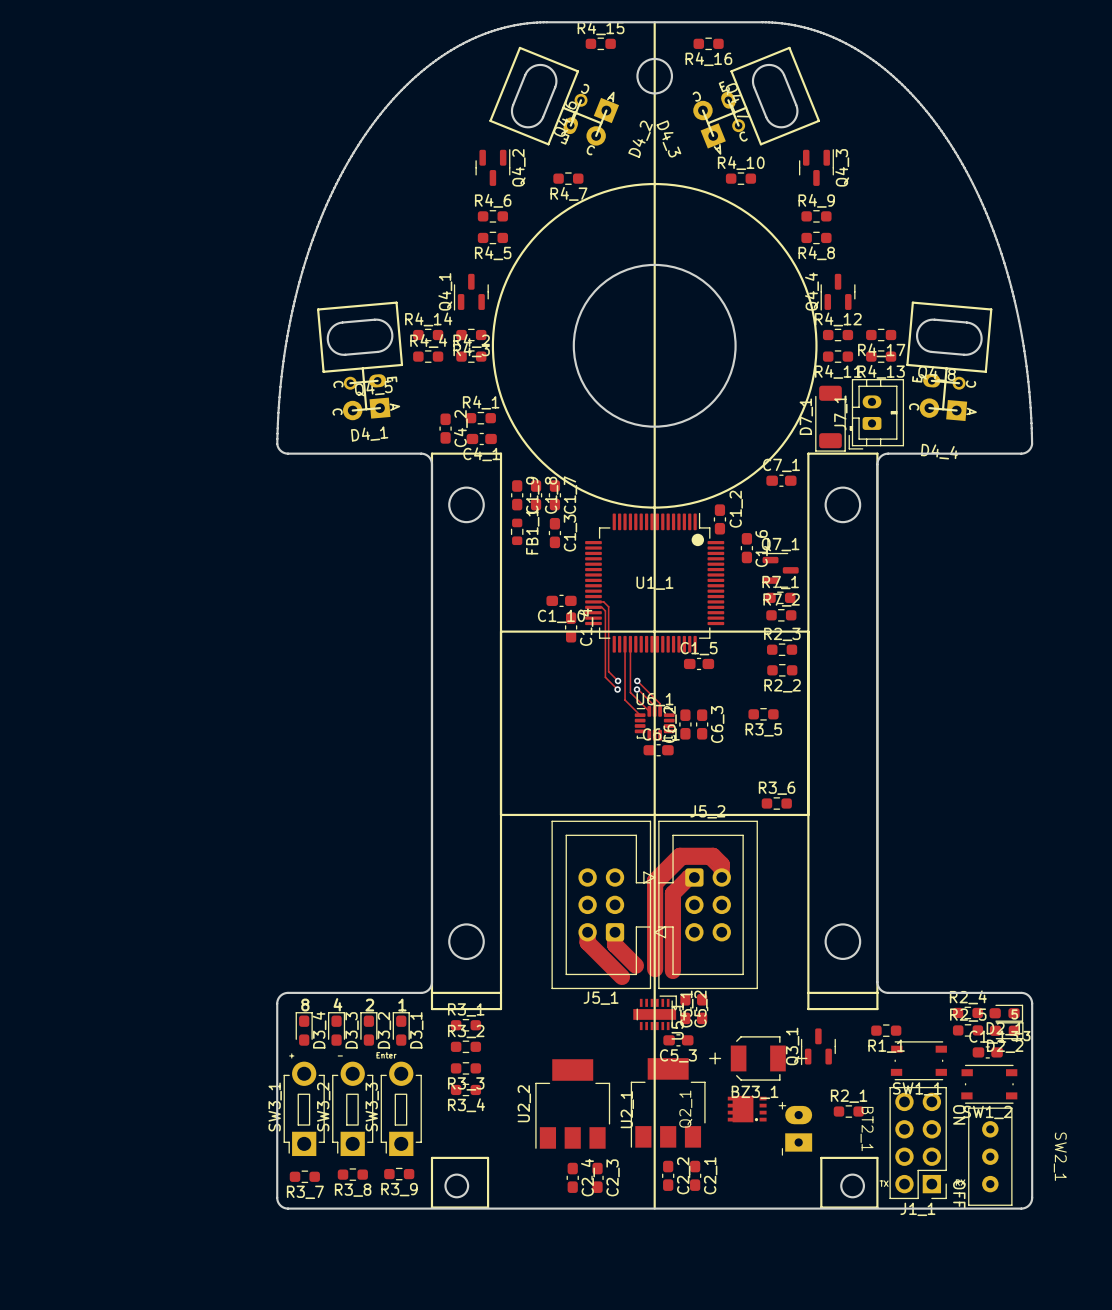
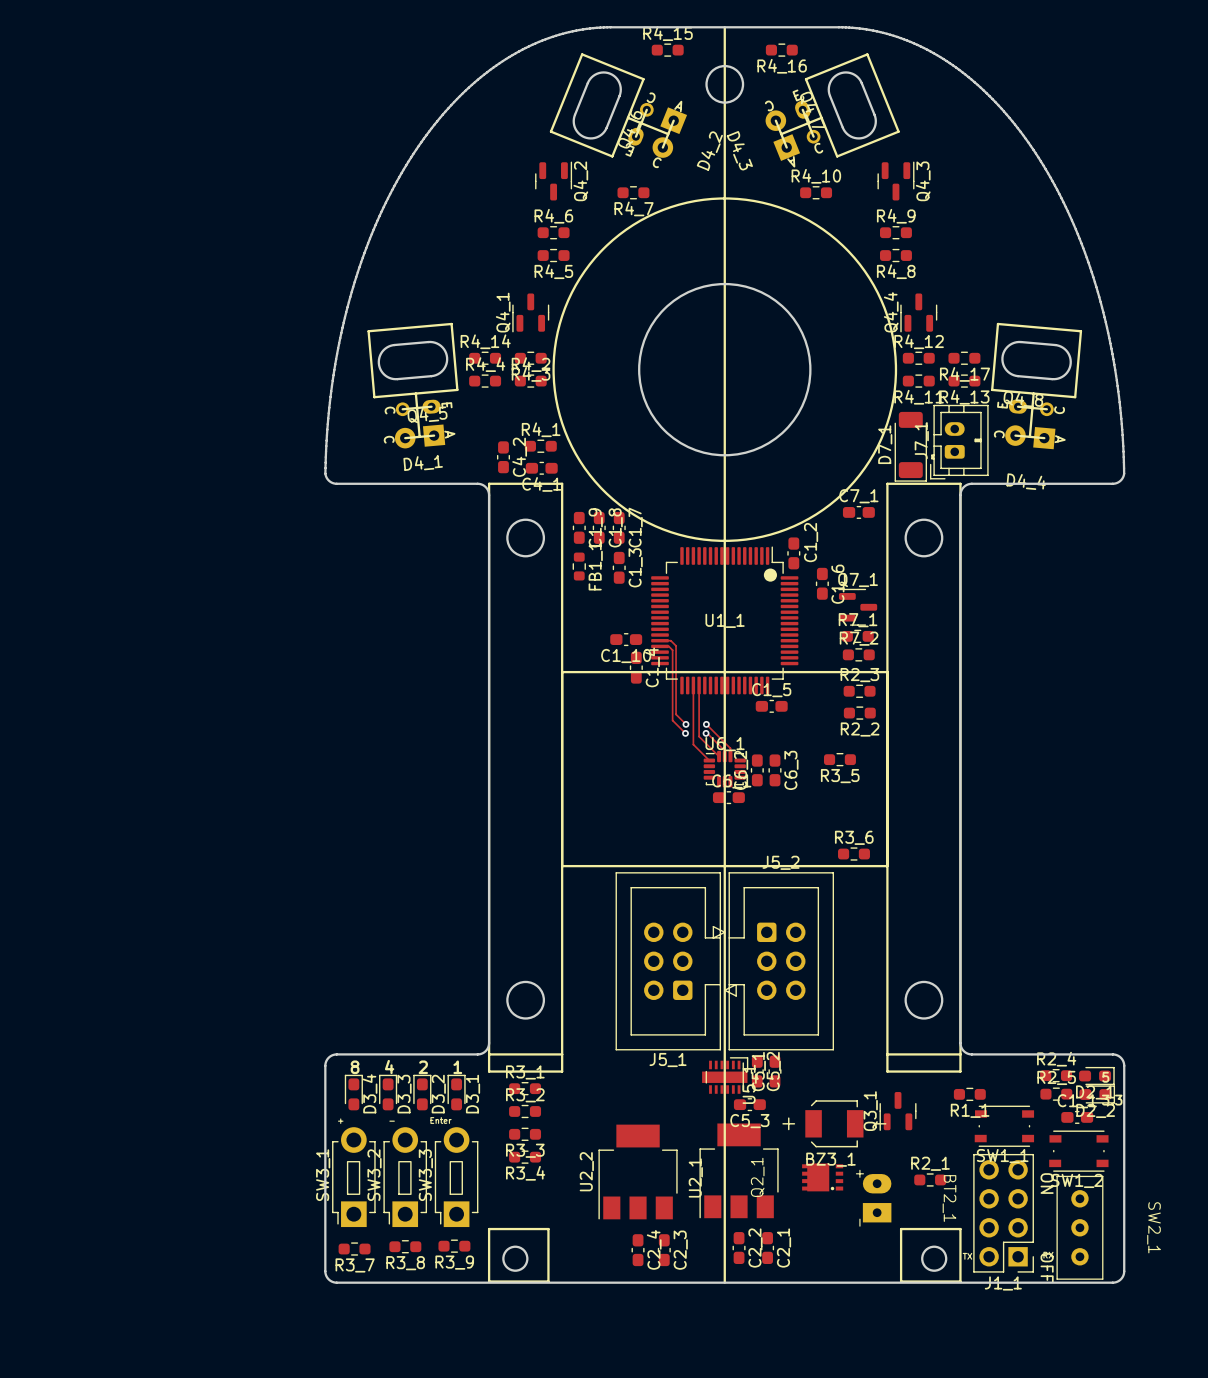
track: (694, 877) (688, 877) (672, 893) (672, 971) -> none
track: (657, 890) (684, 863) (707, 863) (721, 877) (721, 864) (713, 855) (679, 855) (655, 880) (655, 969) -> none
track: (587, 932) (587, 942) (622, 976) -> none
track: (615, 932) (615, 944) (635, 965) -> none

